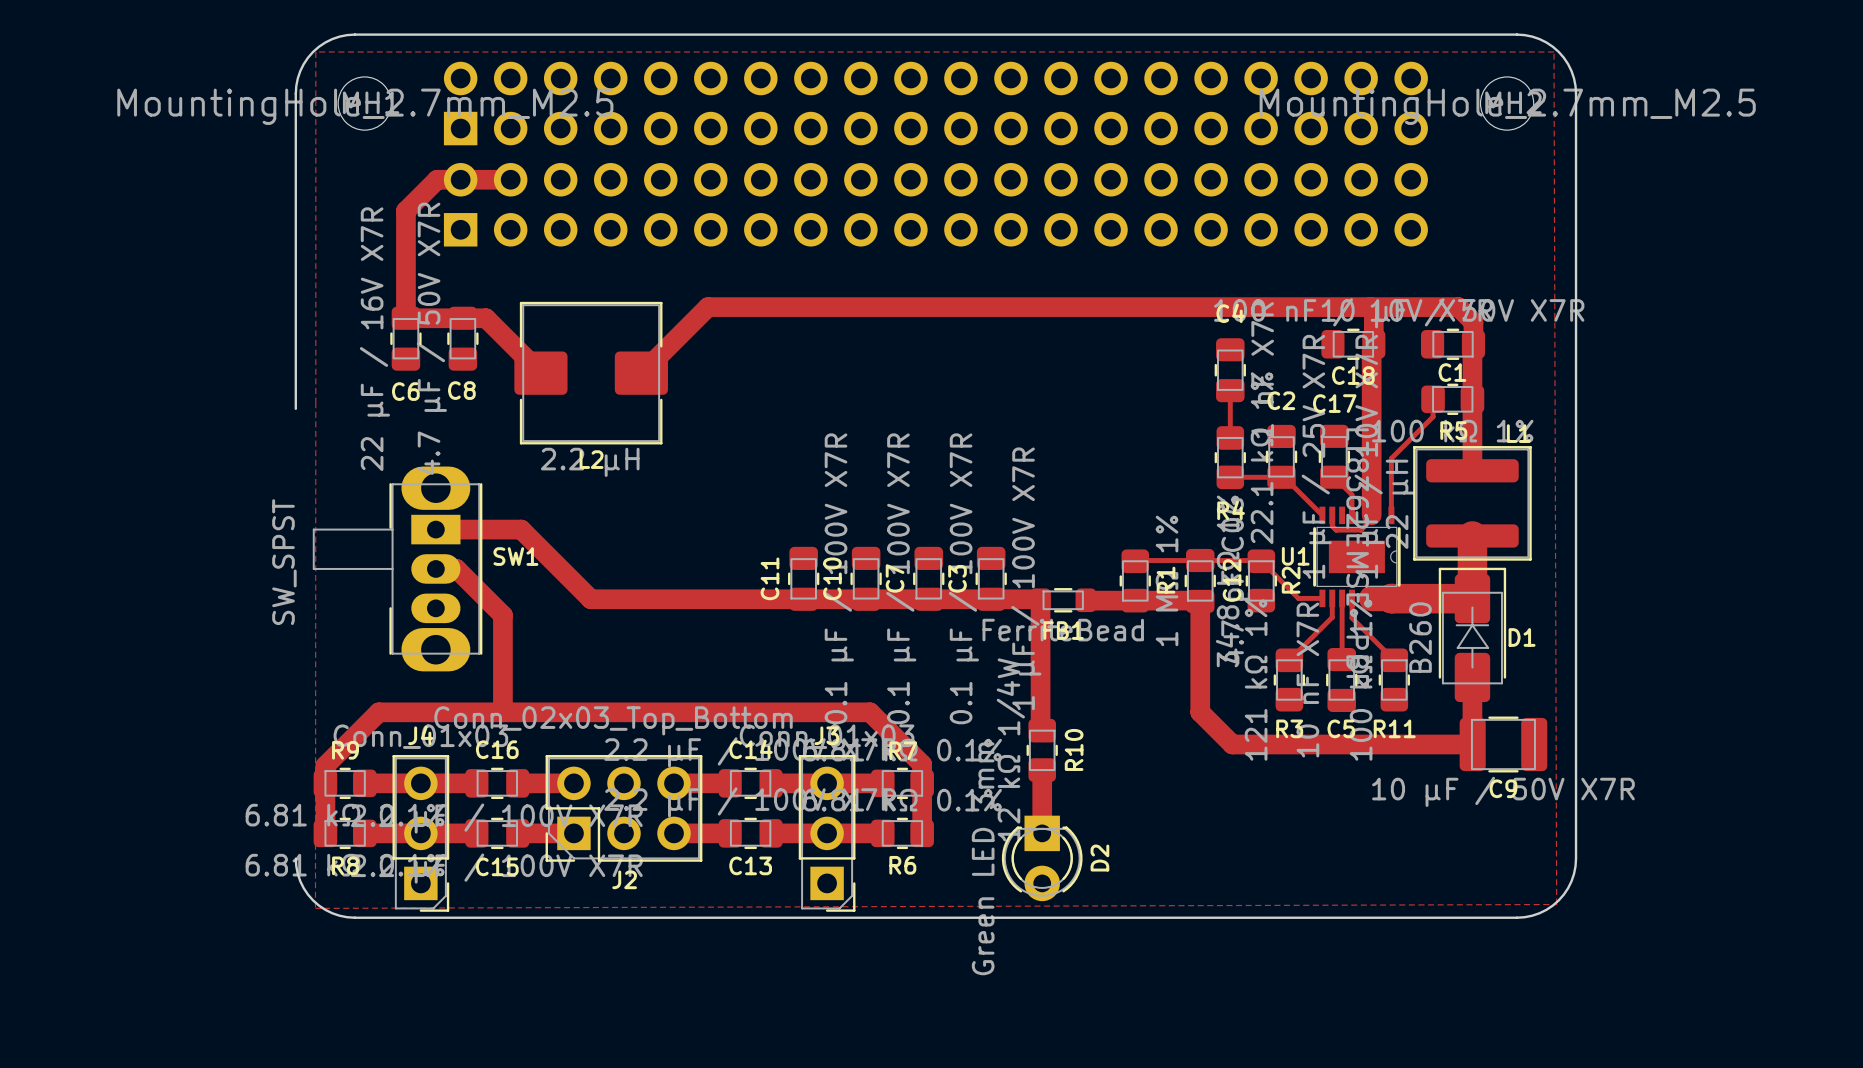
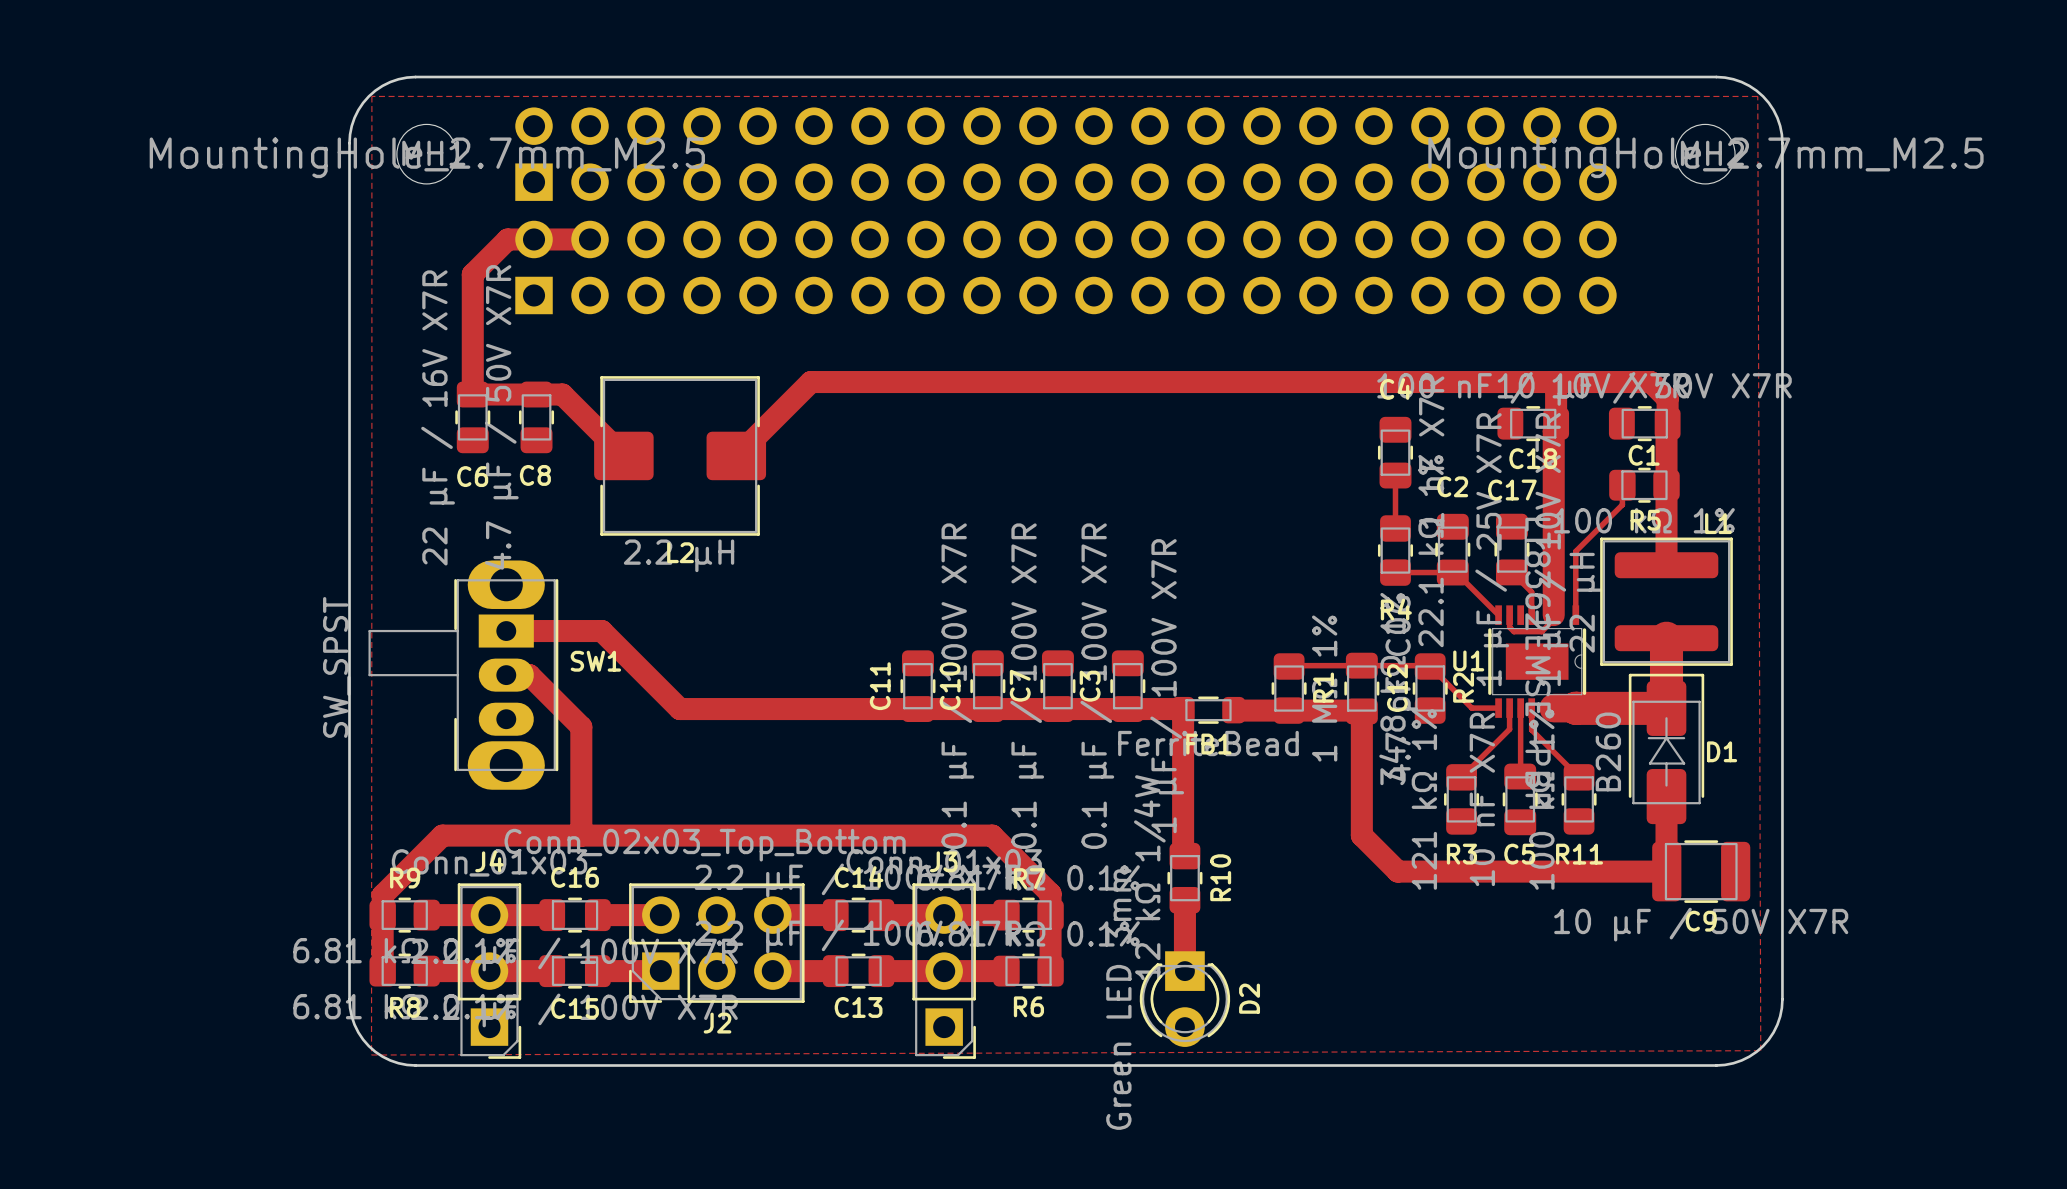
board edge: none -> (349, 495) (349, 999)

